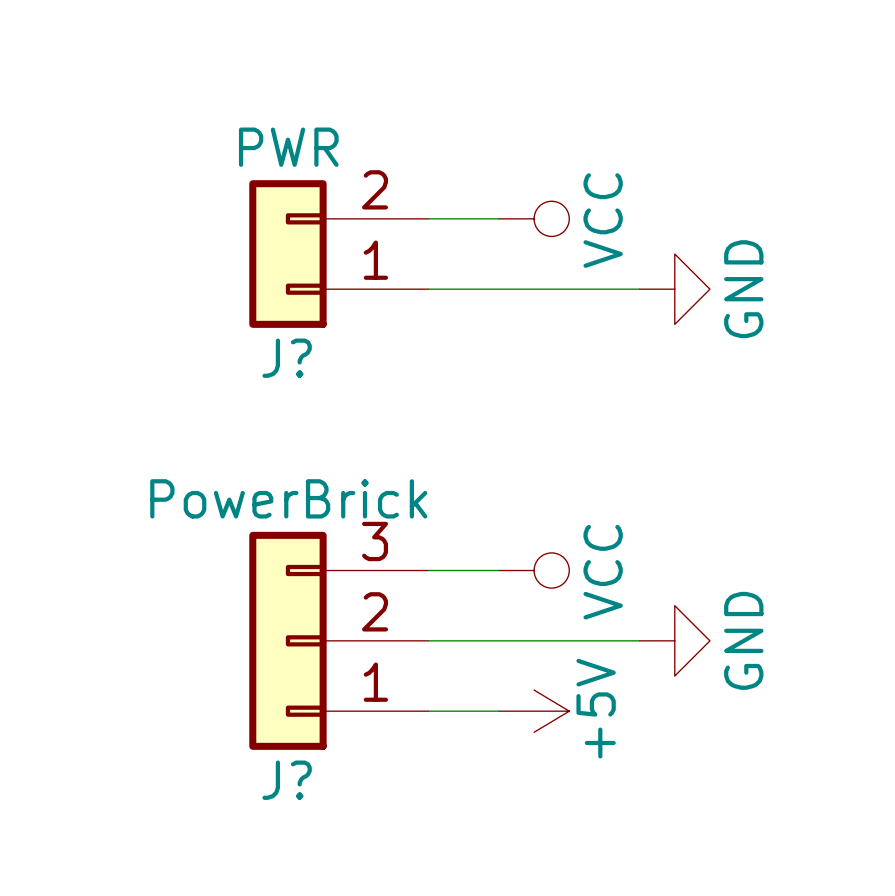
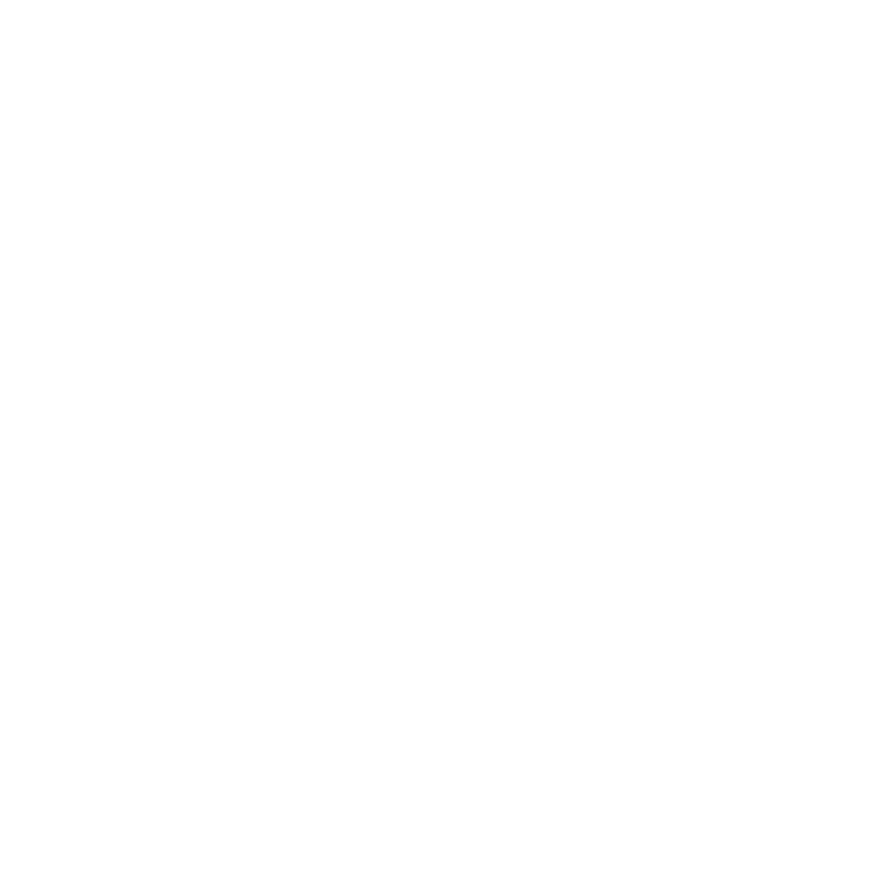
wire: (428, 218) (498, 218) -> none
power symbol: VCC (534, 218) -> none
J?: PWR (338, 254) -> none
wire: (428, 289) (639, 289) -> none
power symbol: GND (674, 289) -> none
wire: (428, 570) (498, 570) -> none
power symbol: VCC (534, 570) -> none
J?: PowerBrick (338, 640) -> none
wire: (428, 640) (639, 640) -> none
power symbol: GND (674, 640) -> none
wire: (428, 711) (498, 711) -> none
power symbol: +5V (534, 711) -> none

